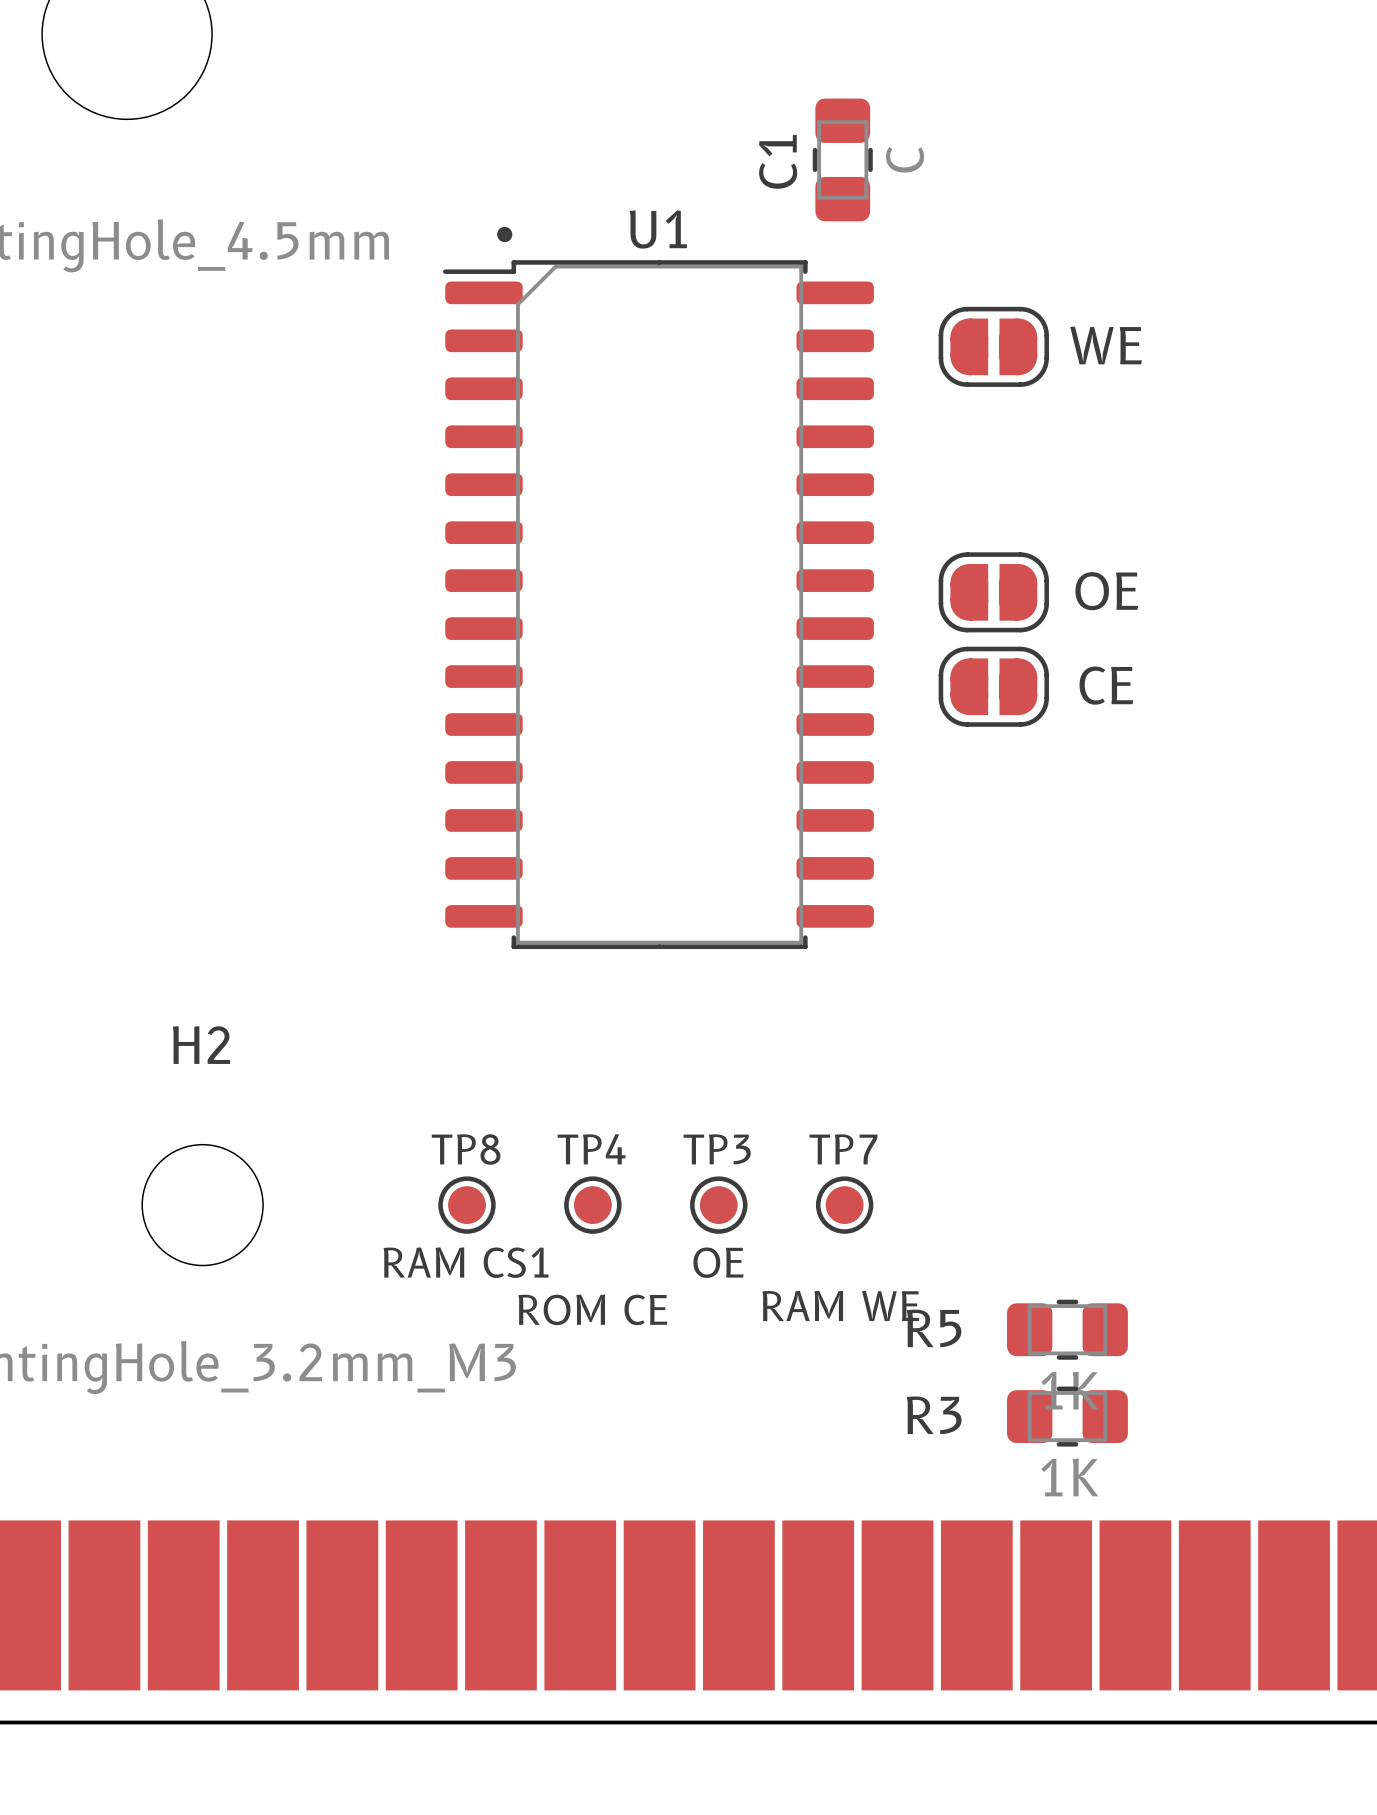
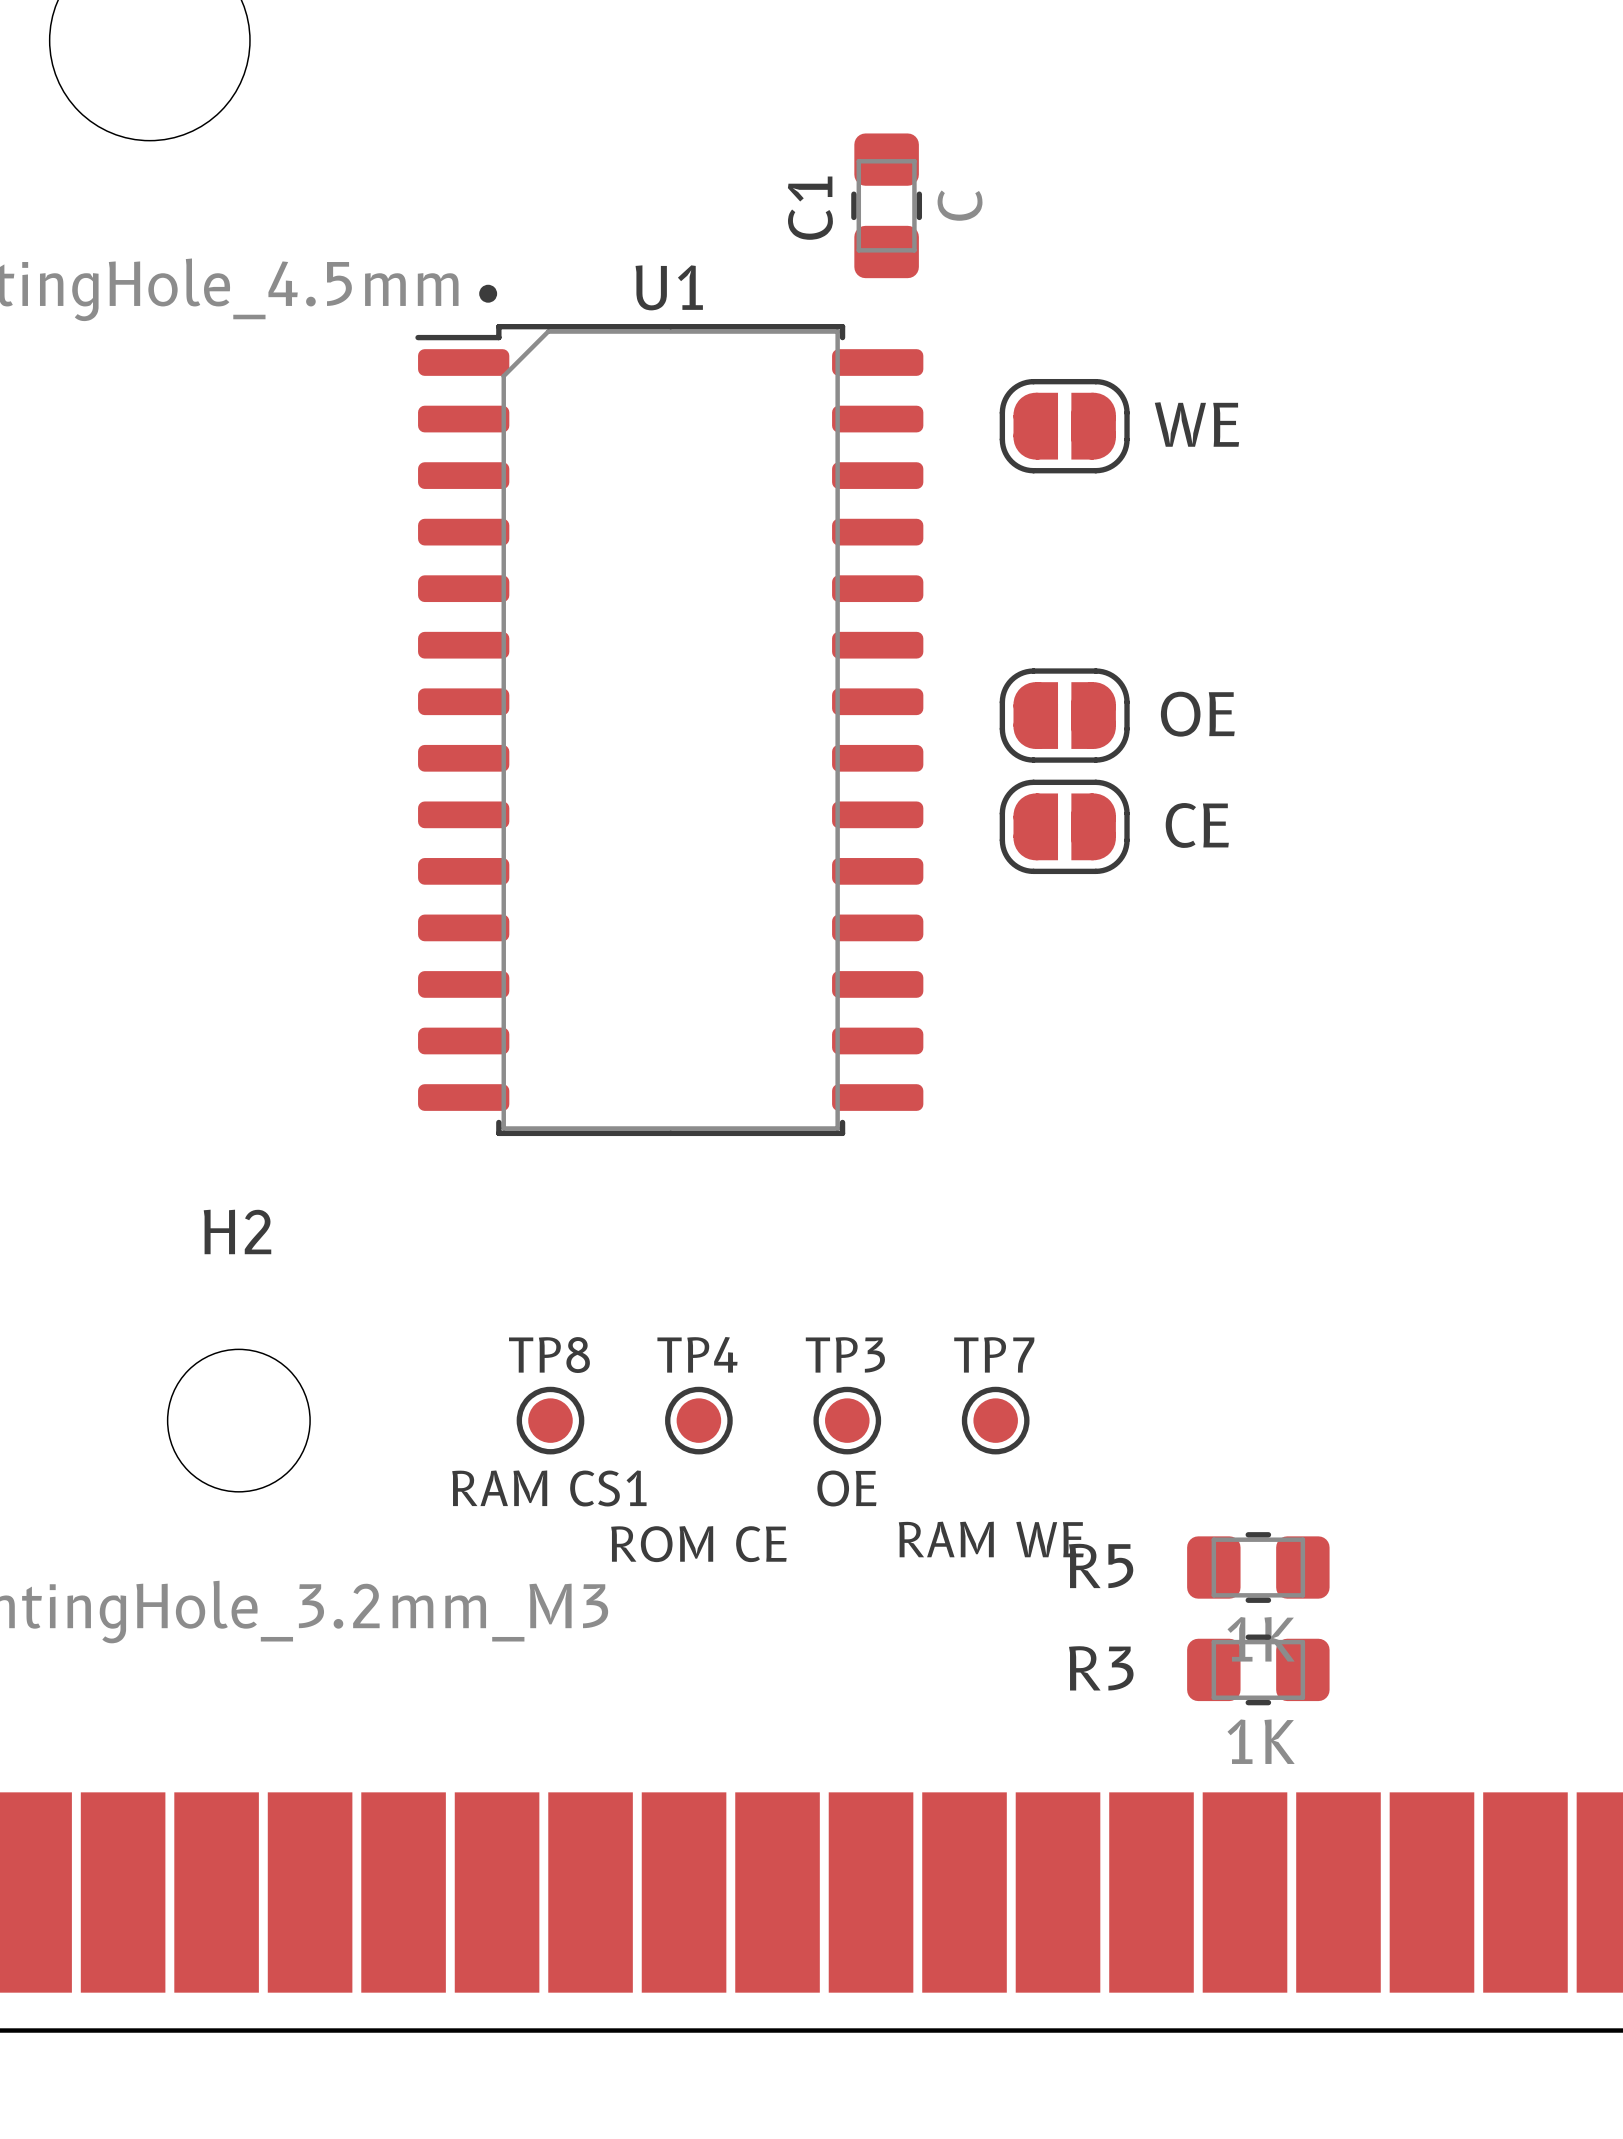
C1 position: (842, 159) -> (886, 205)
part position: (993, 346) -> (1064, 426)
U1 position: (658, 587) -> (669, 710)
part position: (993, 592) -> (1064, 715)
part position: (993, 686) -> (1064, 826)

